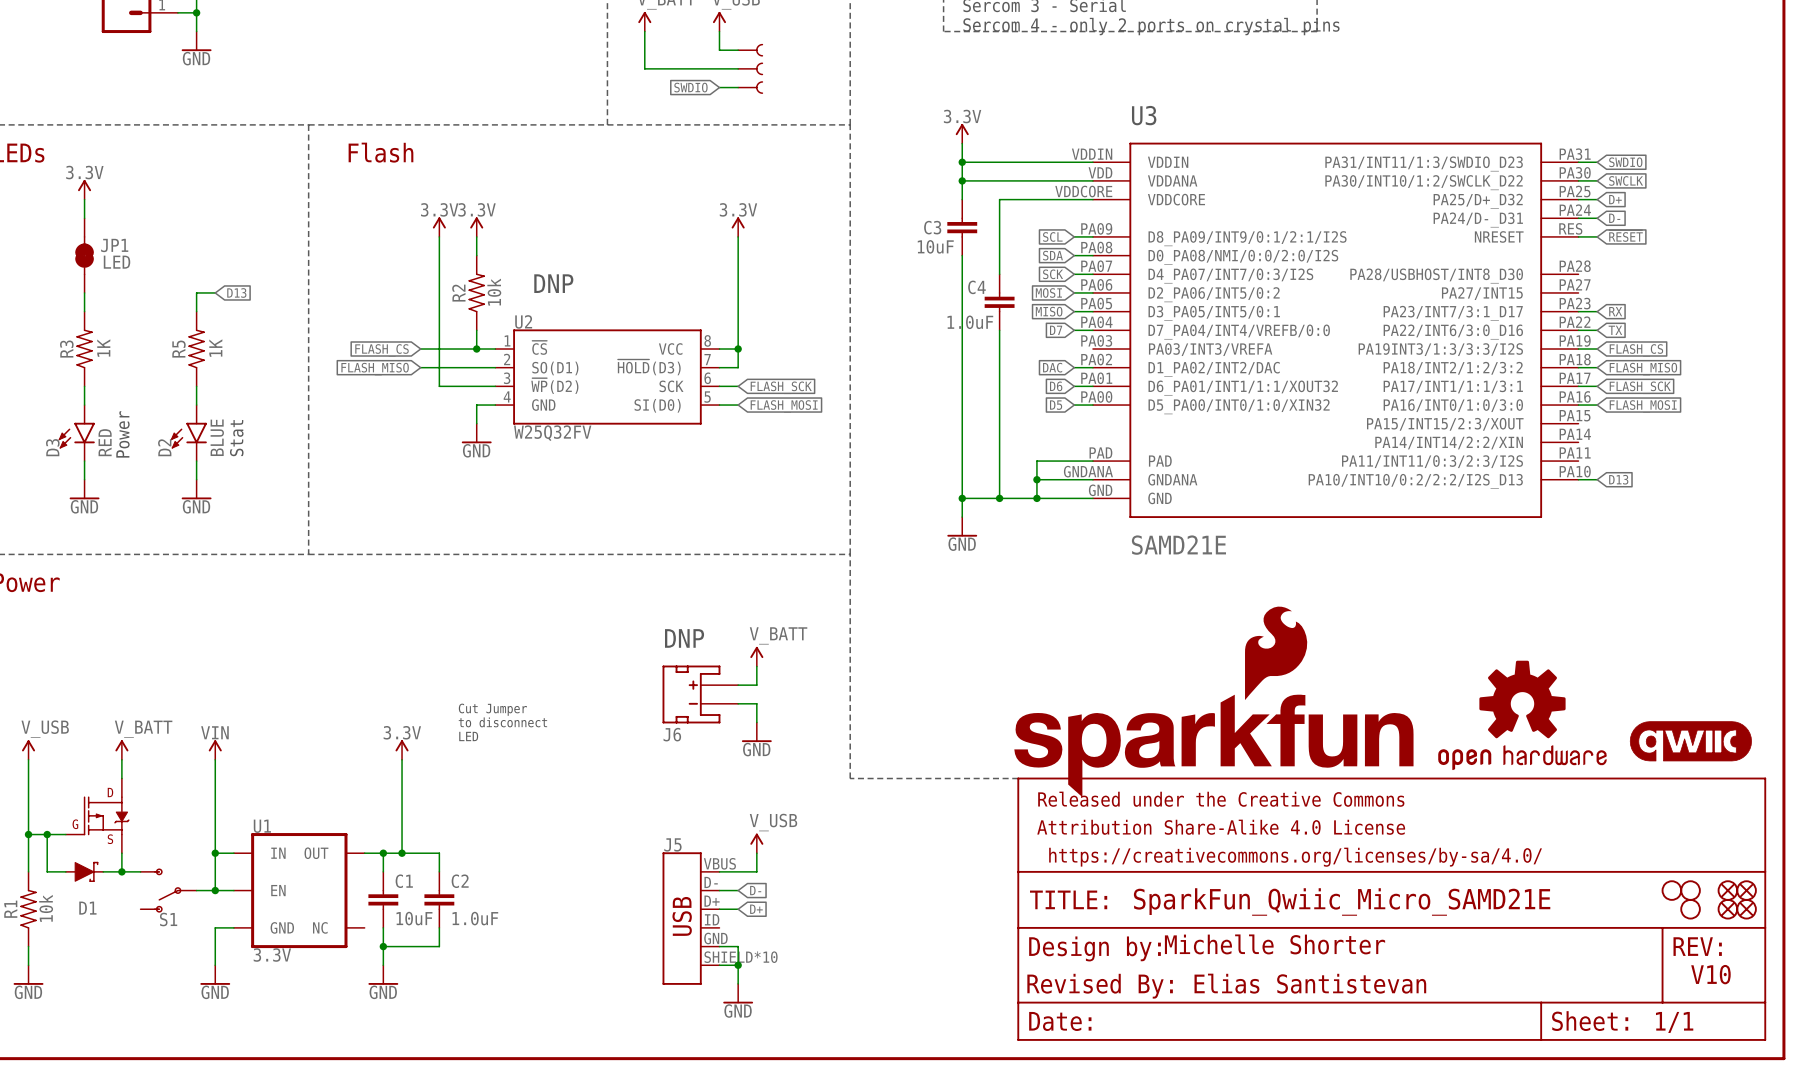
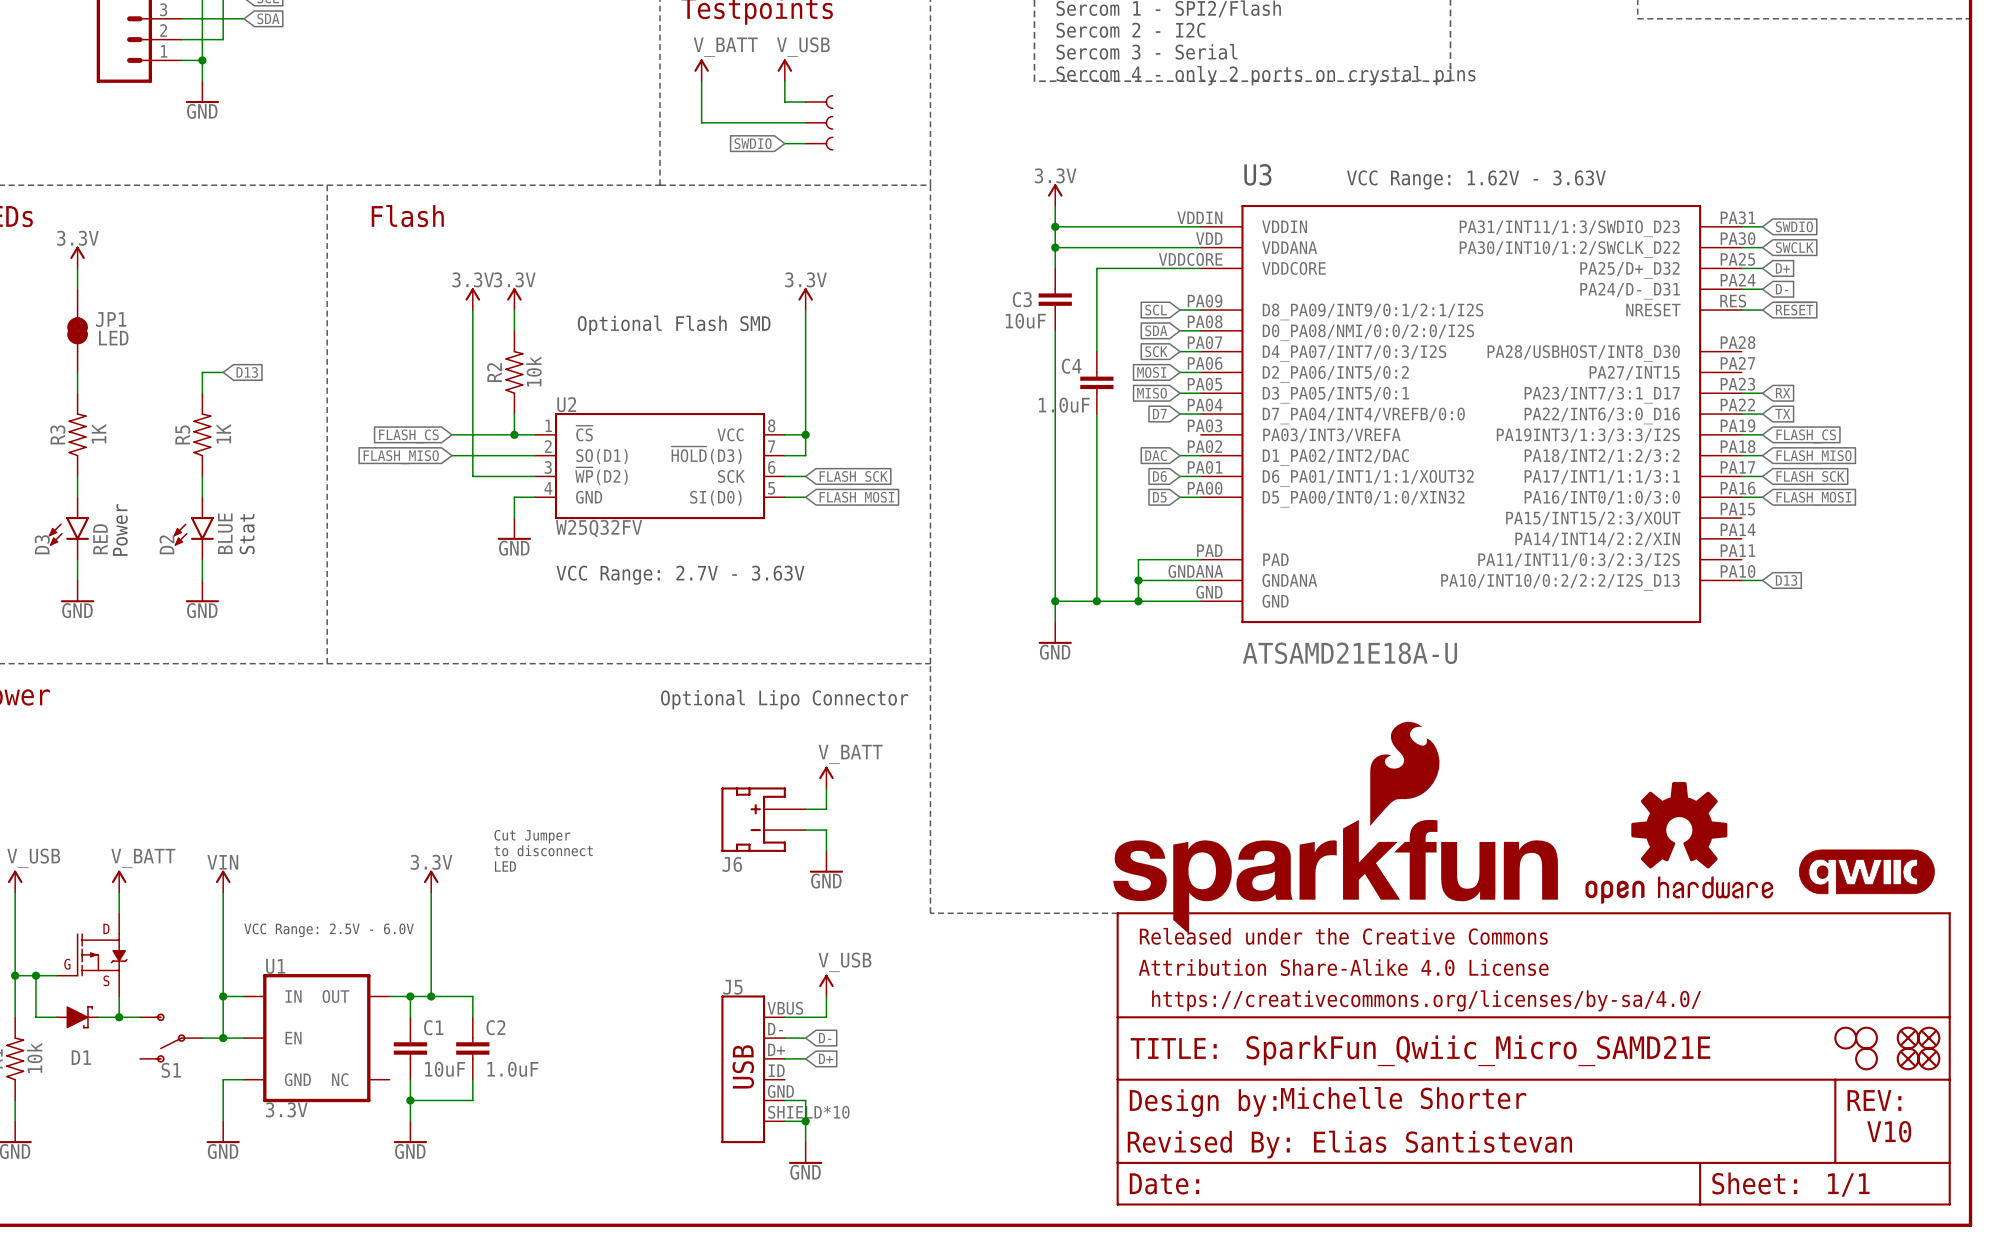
text: none -> VCC Range: 1.62V - 3.63V (1476, 179)
text: none -> Optional Flash SMD (674, 325)
text: DNP (553, 283) -> none
text: none -> VCC Range: 2.7V - 3.63V (680, 575)
part value: SAMD21E (1178, 545) -> ATSAMD21E18A-U (1350, 653)
text: none -> Optional Lipo Connector (784, 699)
text: DNP (684, 638) -> none
text: none -> VCC Range: 2.5V - 6.0V (329, 930)

